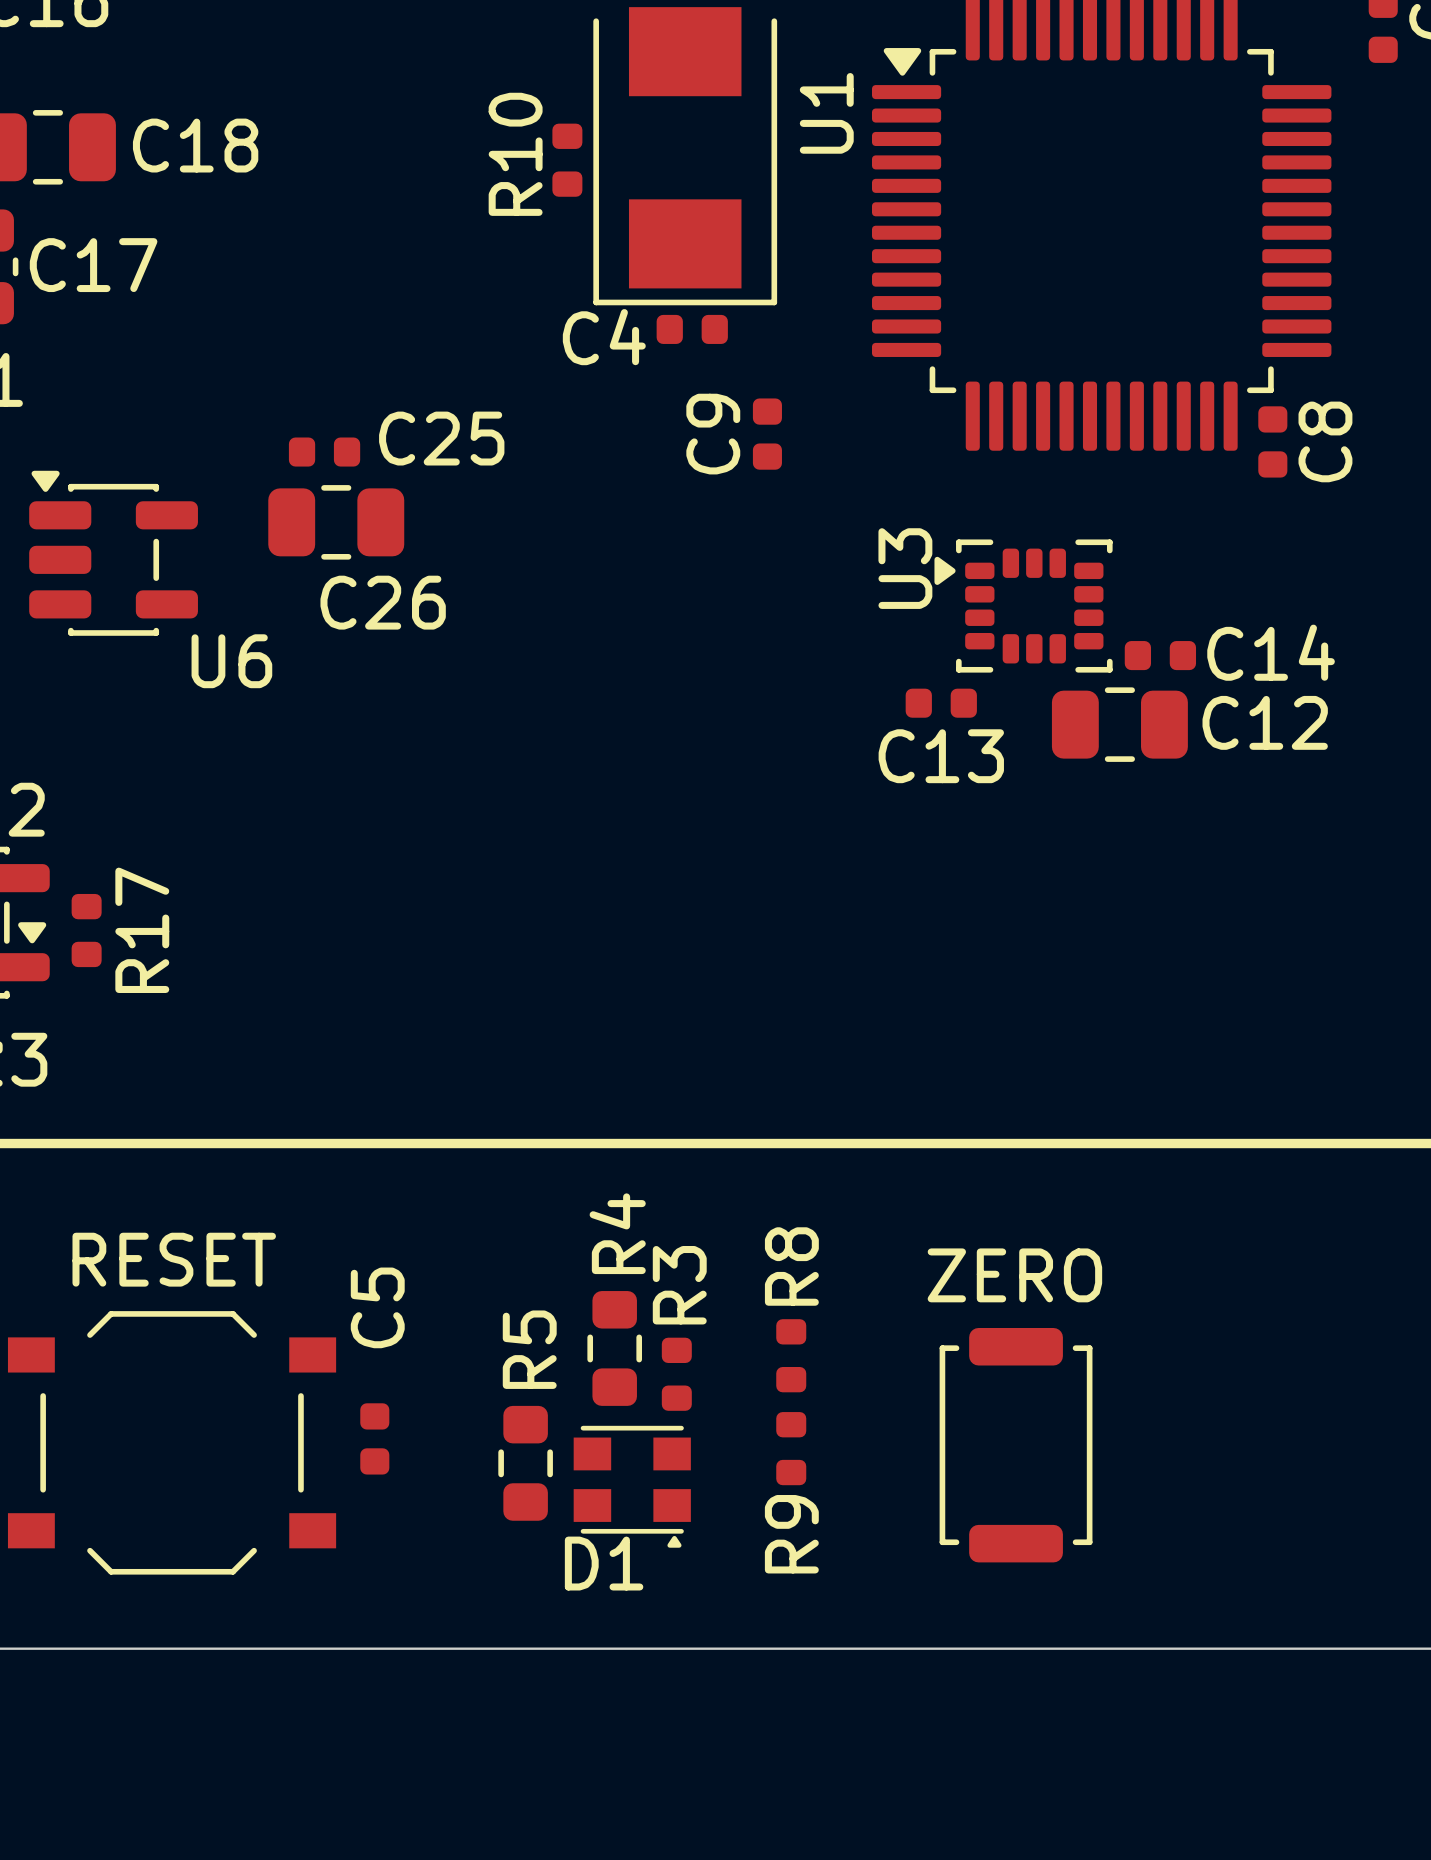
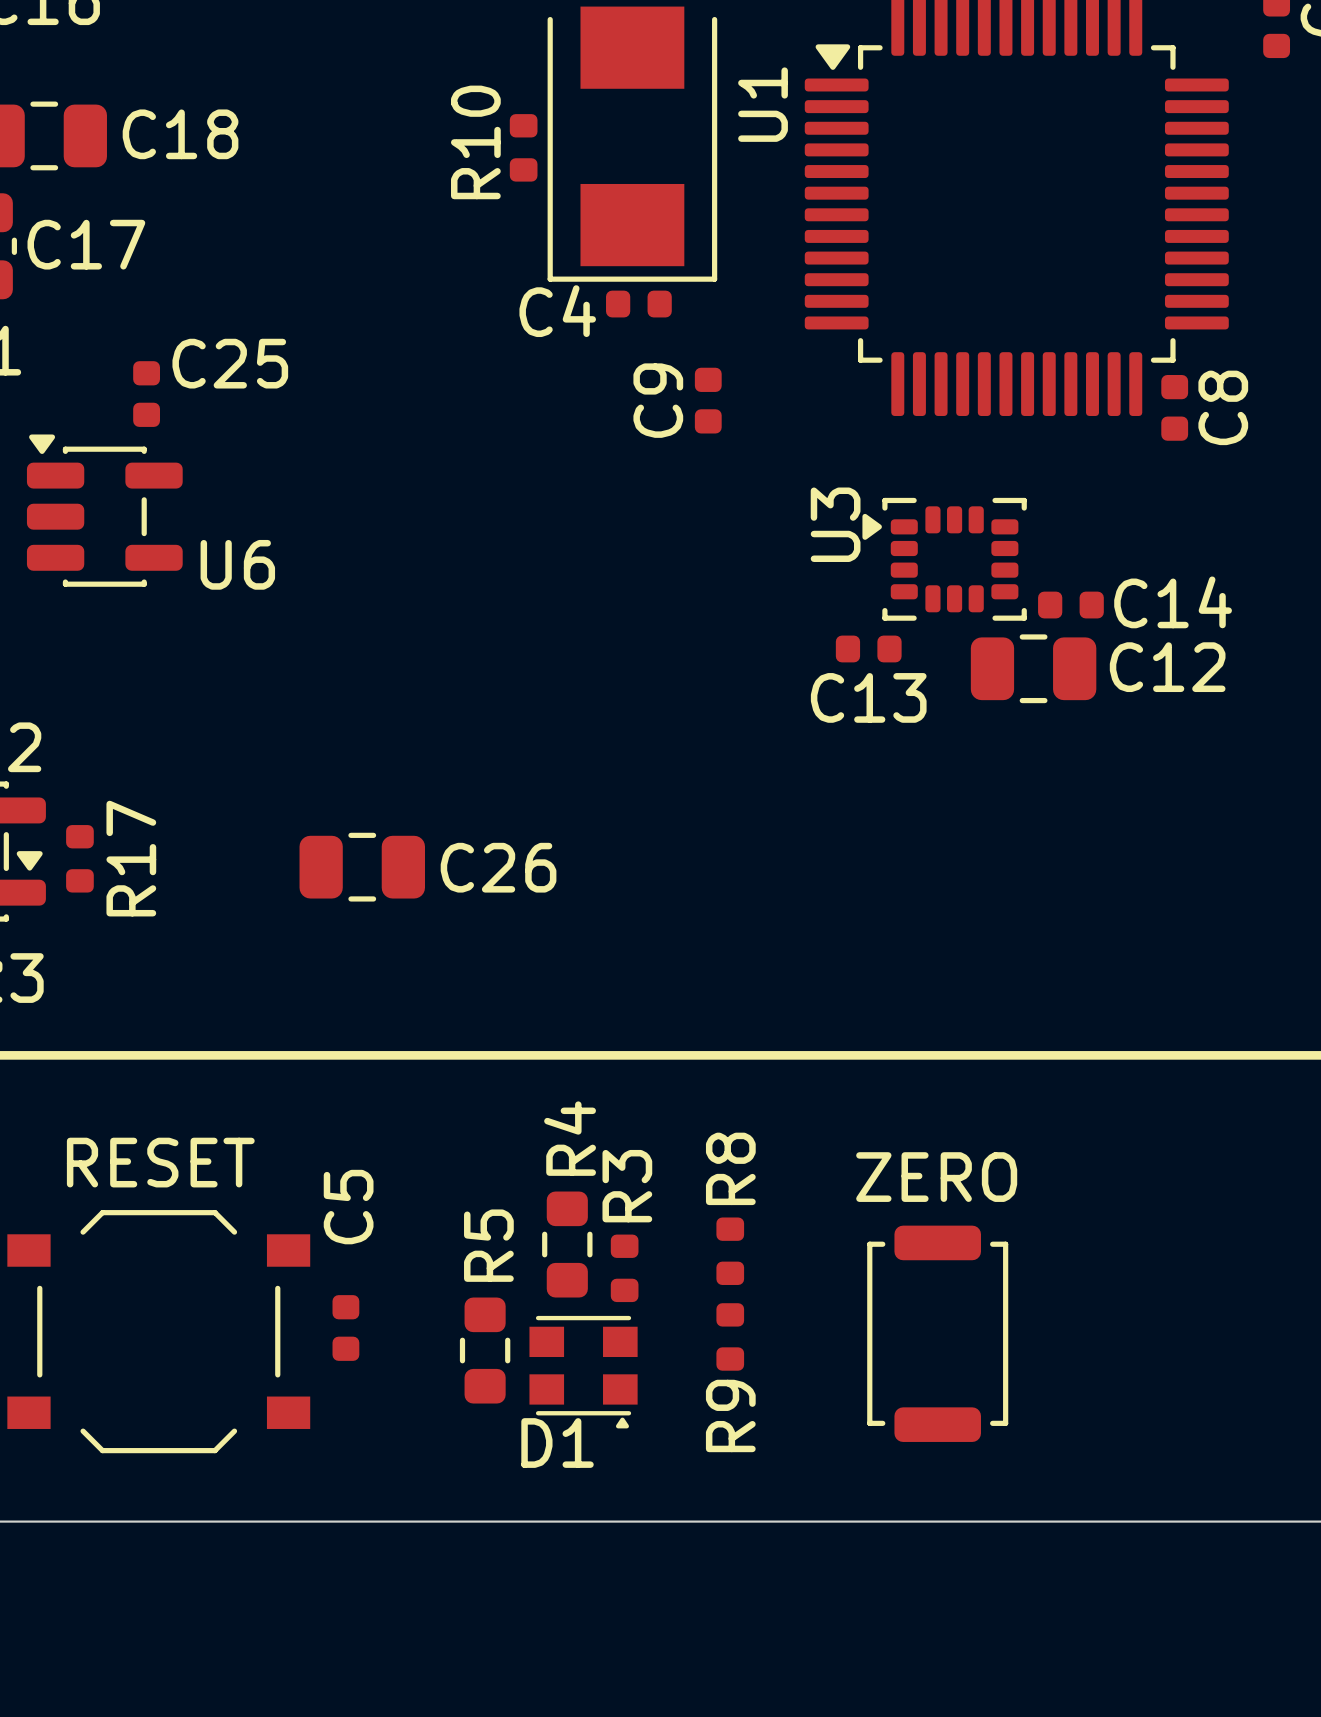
C25 rotation: 0° (324, 452) -> 90° clockwise (146, 394)
C25 position: (324, 452) -> (146, 394)
C26 position: (336, 522) -> (362, 867)
C26 name position: C26 (383, 602) -> C26 (498, 867)
U6 name position: U6 (231, 661) -> U6 (237, 564)

